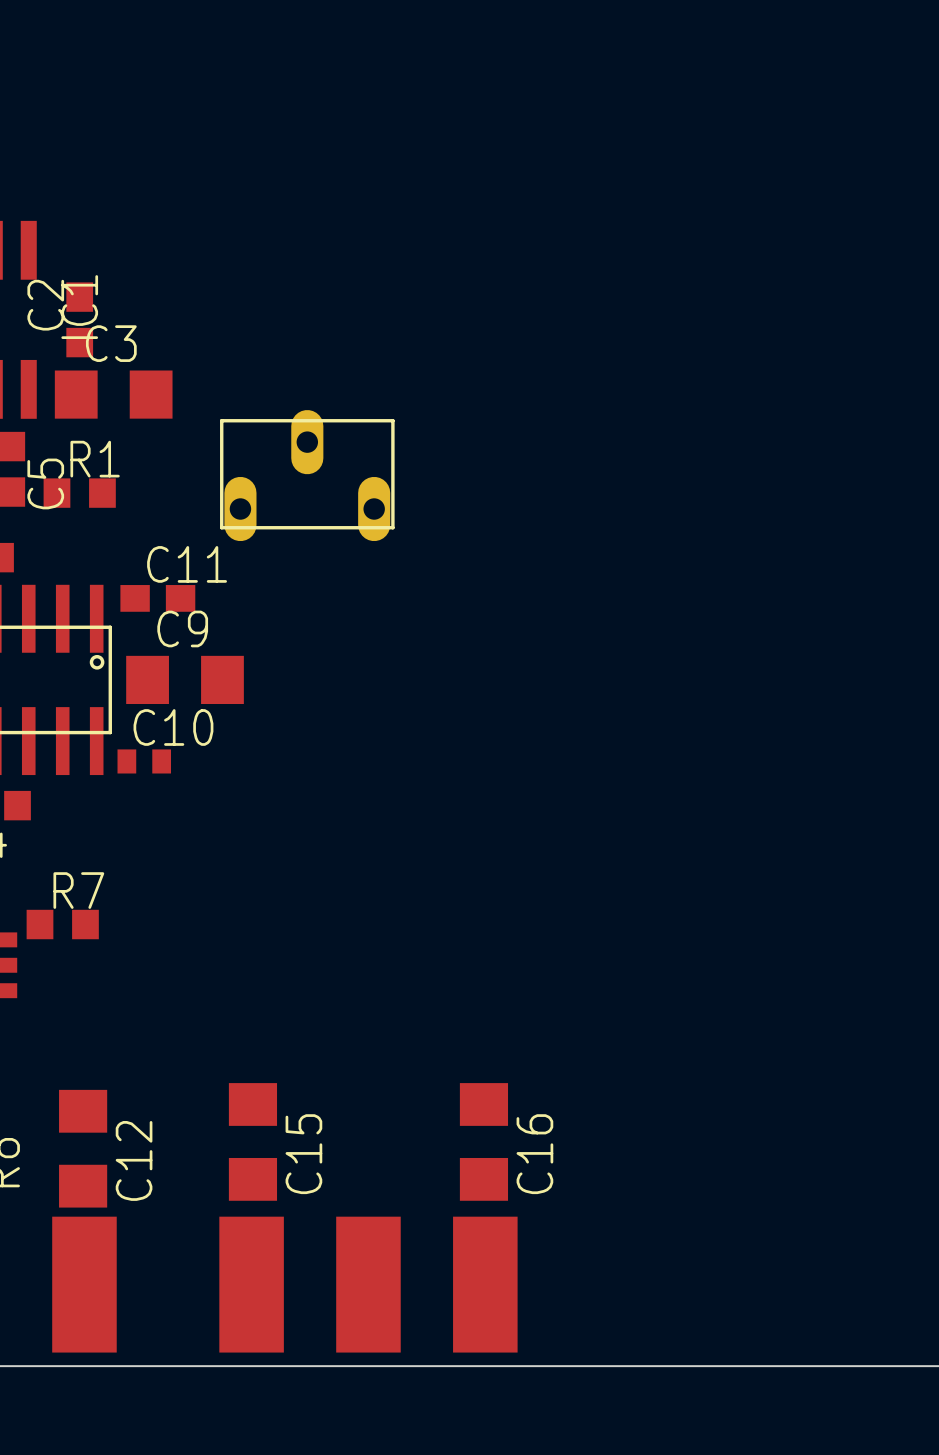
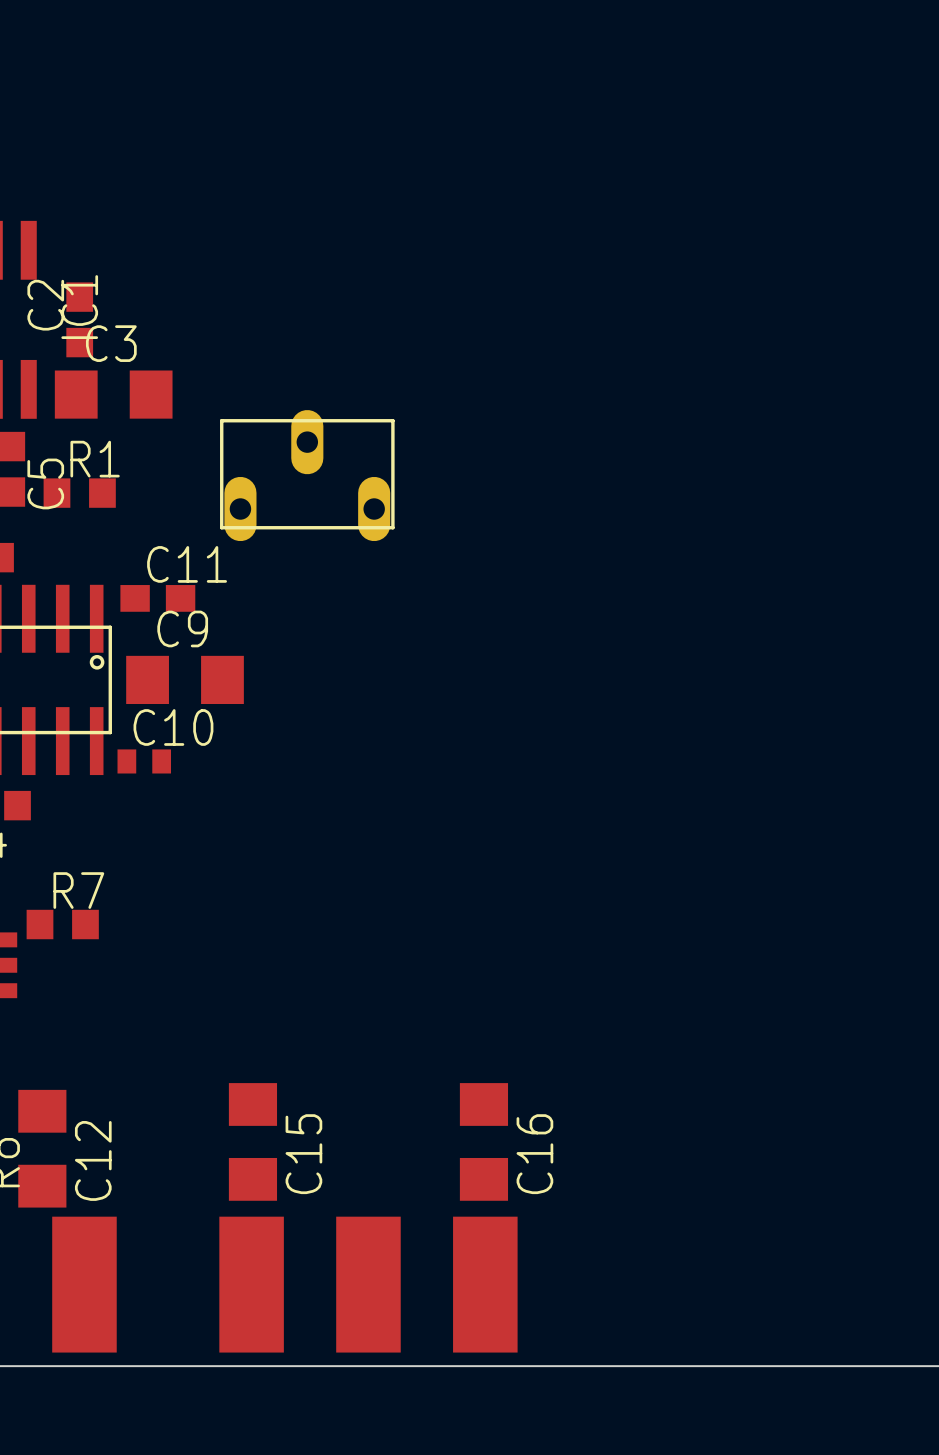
C12 position: (83, 1148) -> (42, 1148)

